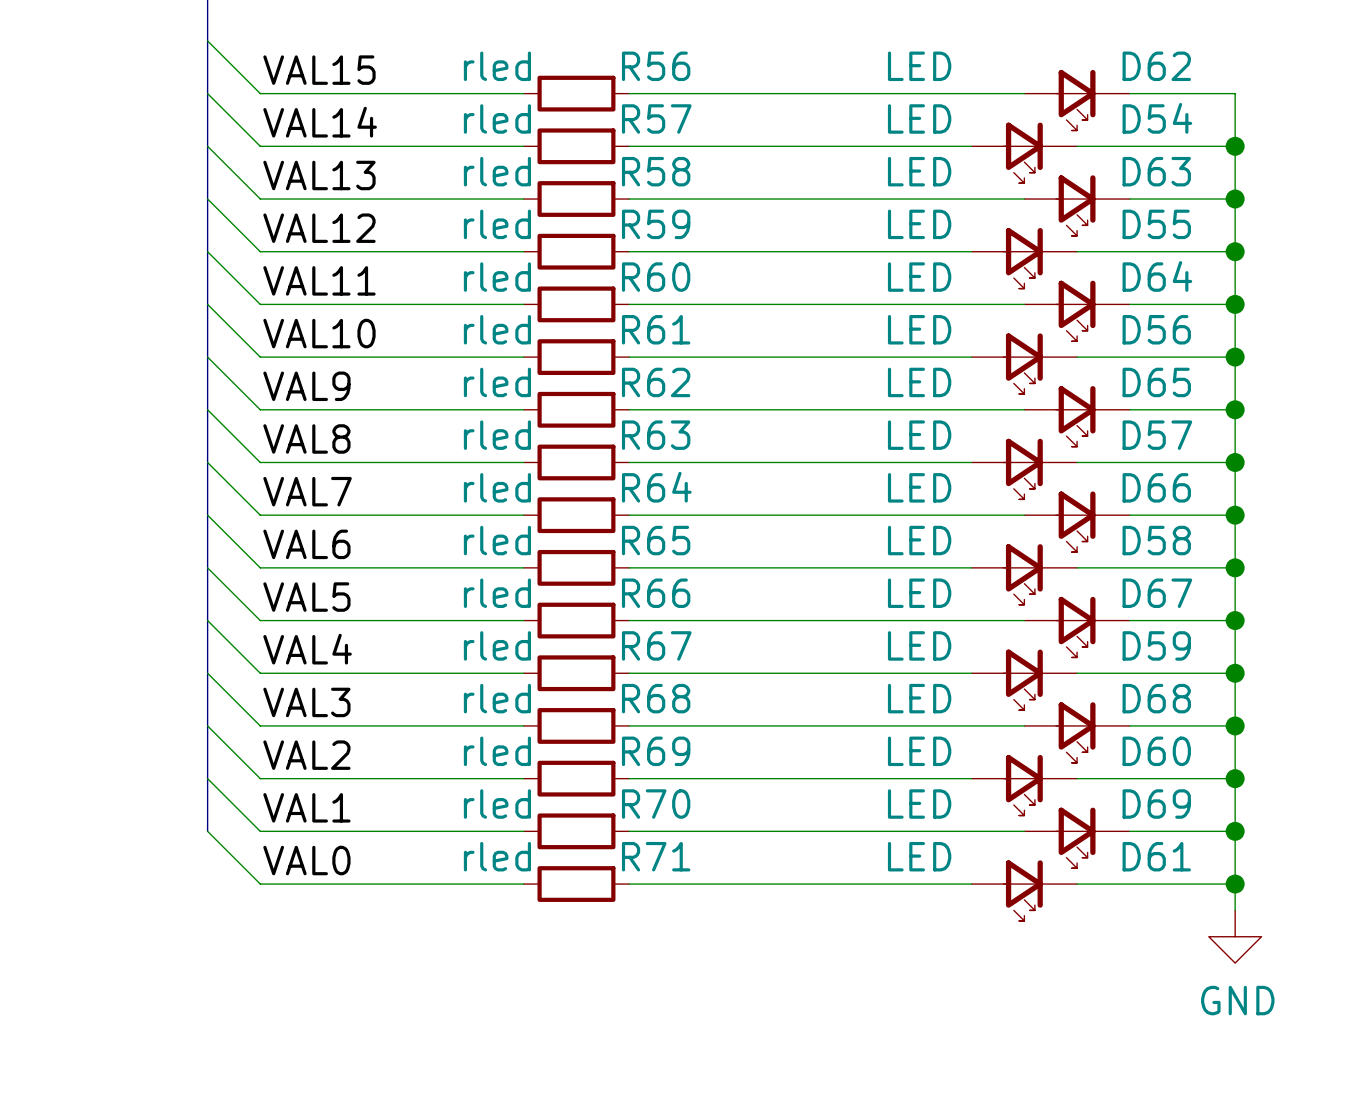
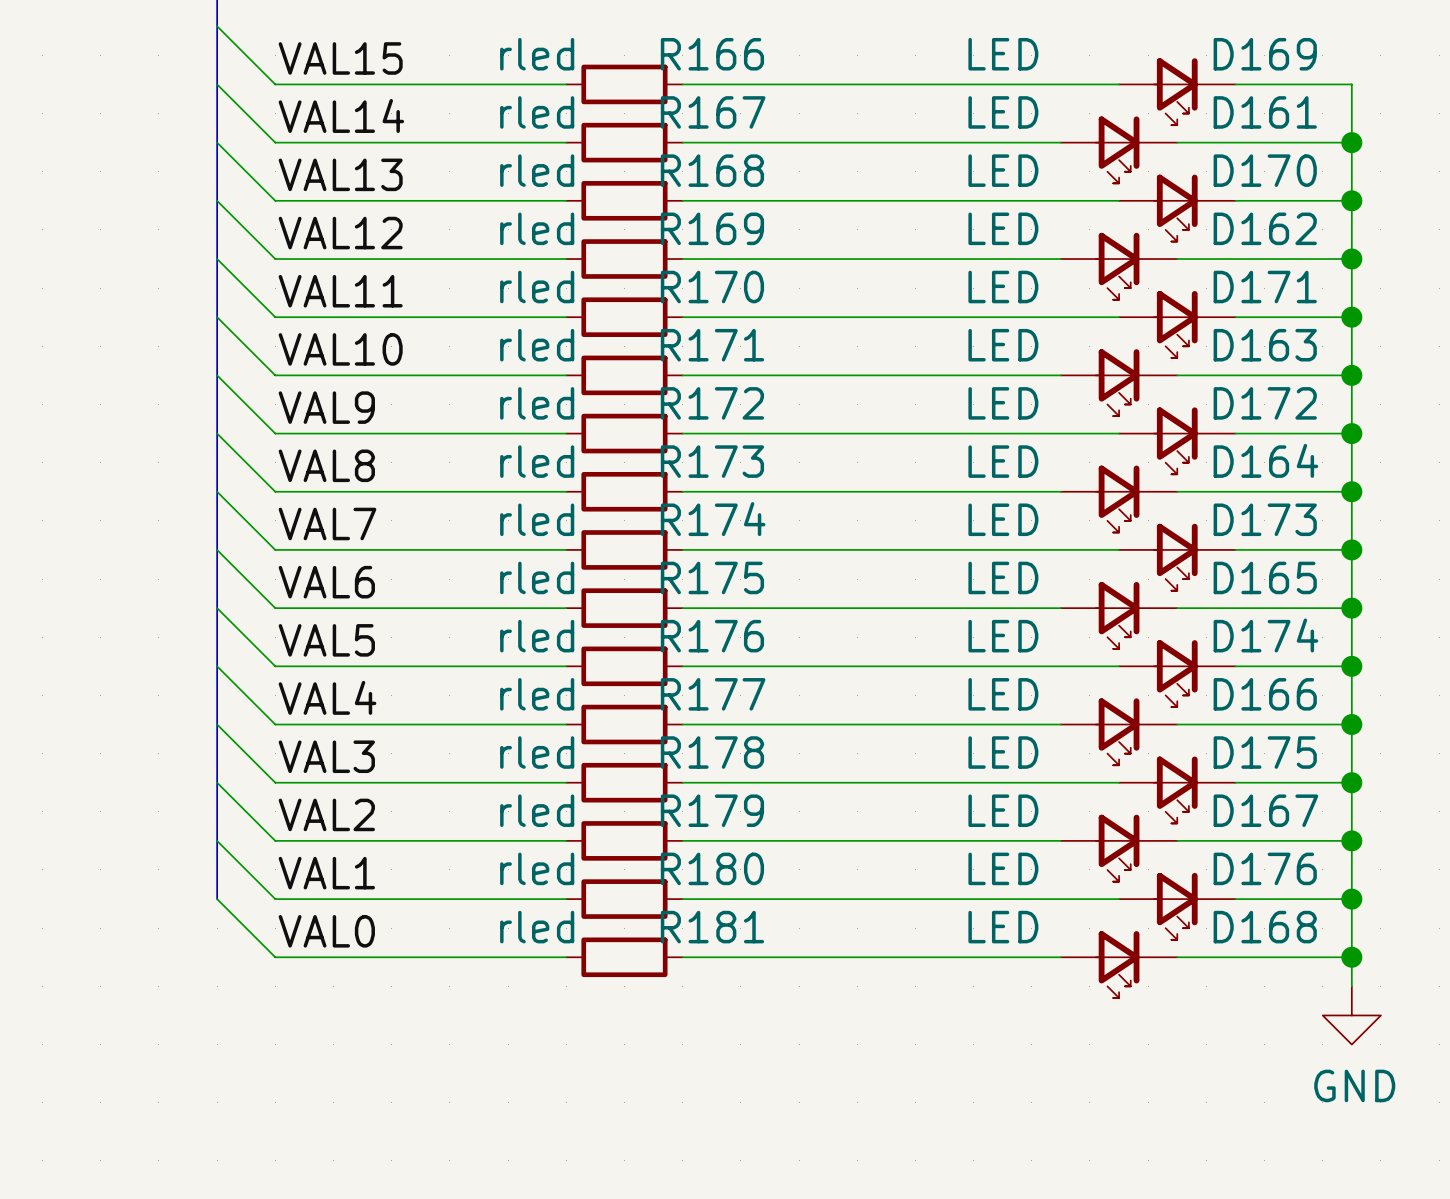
R56 name: R56 (656, 66) -> R166 (712, 54)
D62 name: D62 (1156, 66) -> D169 (1265, 54)
R57 name: R57 (656, 118) -> R167 (713, 112)
D54 name: D54 (1157, 118) -> D161 (1265, 112)
R58 name: R58 (656, 171) -> R168 (712, 170)
D63 name: D63 (1156, 171) -> D170 (1265, 170)
R59 name: R59 (656, 224) -> R169 (712, 228)
D55 name: D55 (1156, 224) -> D162 (1265, 228)
D64 name: D64 (1157, 276) -> D171 (1265, 287)
R60 name: R60 (656, 277) -> R170 (712, 287)
R61 name: R61 (656, 329) -> R171 (712, 345)
D56 name: D56 (1156, 329) -> D163 (1265, 345)
R62 name: R62 (656, 382) -> R172 (712, 403)
D65 name: D65 (1156, 382) -> D172 (1265, 403)
R63 name: R63 (656, 435) -> R173 (712, 461)
D57 name: D57 (1157, 435) -> D164 (1265, 460)
R64 name: R64 (656, 487) -> R174 (713, 519)
D66 name: D66 (1156, 487) -> D173 (1265, 519)
R65 name: R65 (656, 540) -> R175 (712, 577)
D58 name: D58 (1156, 540) -> D165 (1265, 577)
R66 name: R66 (656, 593) -> R176 (712, 636)
D67 name: D67 (1157, 593) -> D174 (1265, 635)
R67 name: R67 (656, 645) -> R177 (713, 694)
D59 name: D59 (1156, 645) -> D166 (1265, 694)
R68 name: R68 (656, 698) -> R178 (712, 752)
D68 name: D68 (1156, 698) -> D175 (1265, 752)
R69 name: R69 (656, 751) -> R179 (712, 810)
D60 name: D60 (1156, 751) -> D167 (1265, 810)
R70 name: R70 (656, 804) -> R180 (712, 868)
D69 name: D69 (1156, 804) -> D176 (1265, 868)
R71 name: R71 (656, 856) -> R181 (712, 927)
D61 name: D61 (1156, 856) -> D168 (1265, 927)

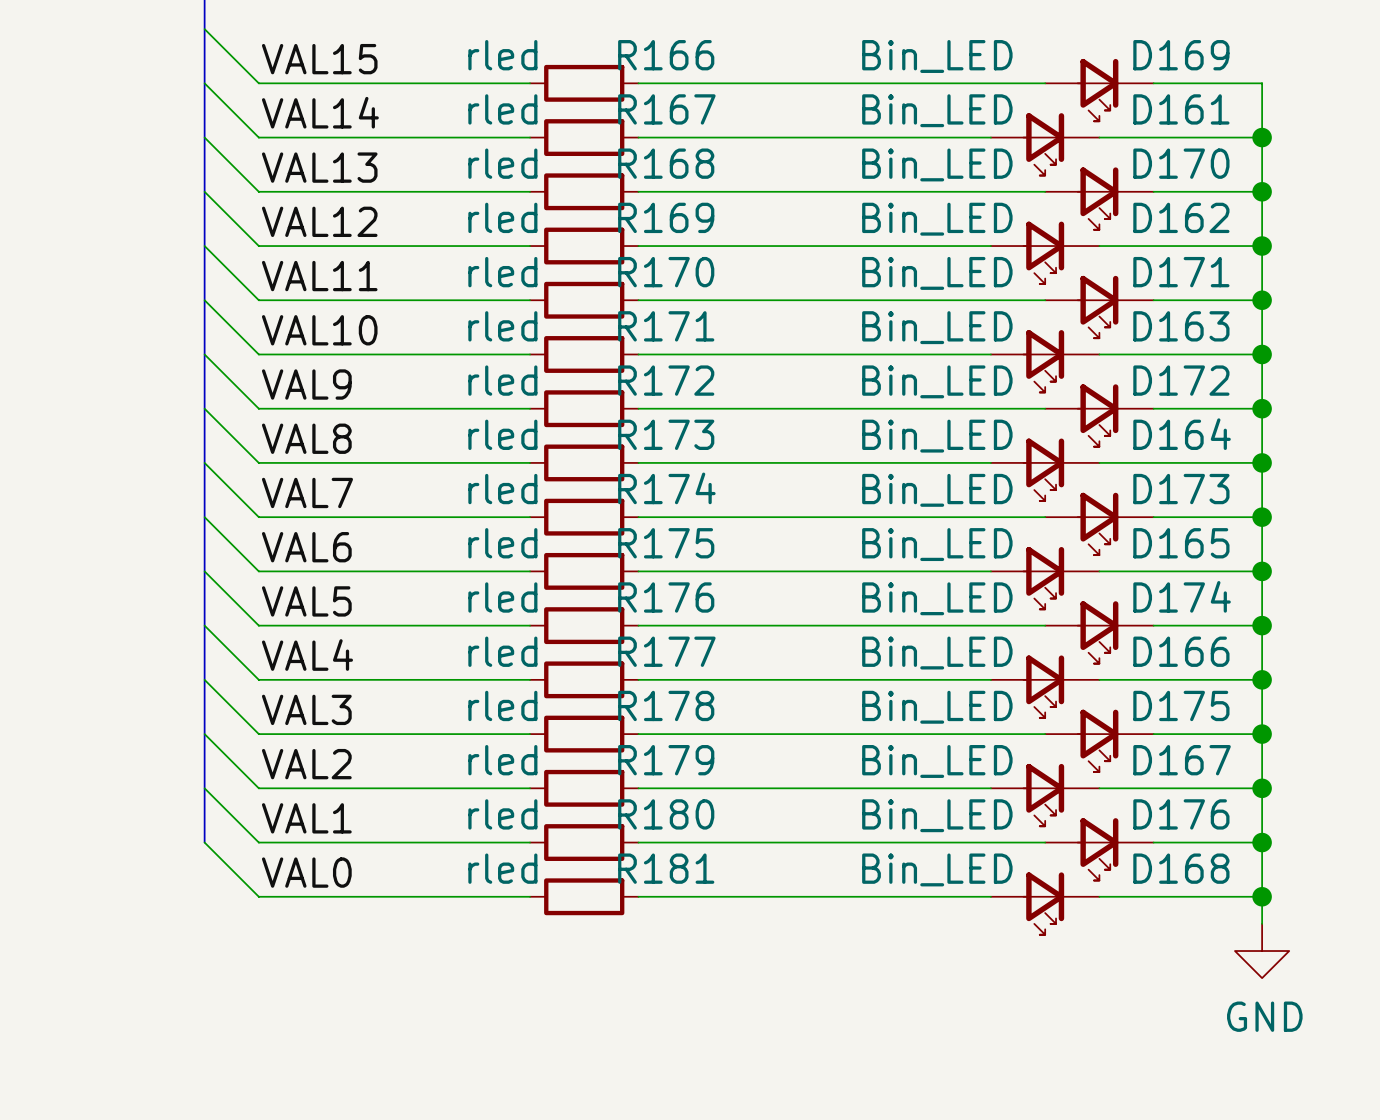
D169 value: LED (1003, 54) -> Bin_LED (937, 56)
D161 value: LED (1003, 112) -> Bin_LED (937, 110)
D170 value: LED (1003, 170) -> Bin_LED (937, 164)
D162 value: LED (1003, 228) -> Bin_LED (937, 219)
D171 value: LED (1003, 287) -> Bin_LED (937, 273)
D163 value: LED (1003, 345) -> Bin_LED (937, 327)
D172 value: LED (1003, 403) -> Bin_LED (937, 381)
D164 value: LED (1003, 461) -> Bin_LED (937, 436)
D173 value: LED (1003, 519) -> Bin_LED (937, 490)
D165 value: LED (1003, 577) -> Bin_LED (937, 544)
D174 value: LED (1003, 636) -> Bin_LED (937, 598)
D166 value: LED (1003, 694) -> Bin_LED (937, 653)
D175 value: LED (1003, 752) -> Bin_LED (937, 707)
D167 value: LED (1003, 810) -> Bin_LED (937, 761)
D176 value: LED (1003, 868) -> Bin_LED (937, 815)
D168 value: LED (1003, 927) -> Bin_LED (937, 869)

